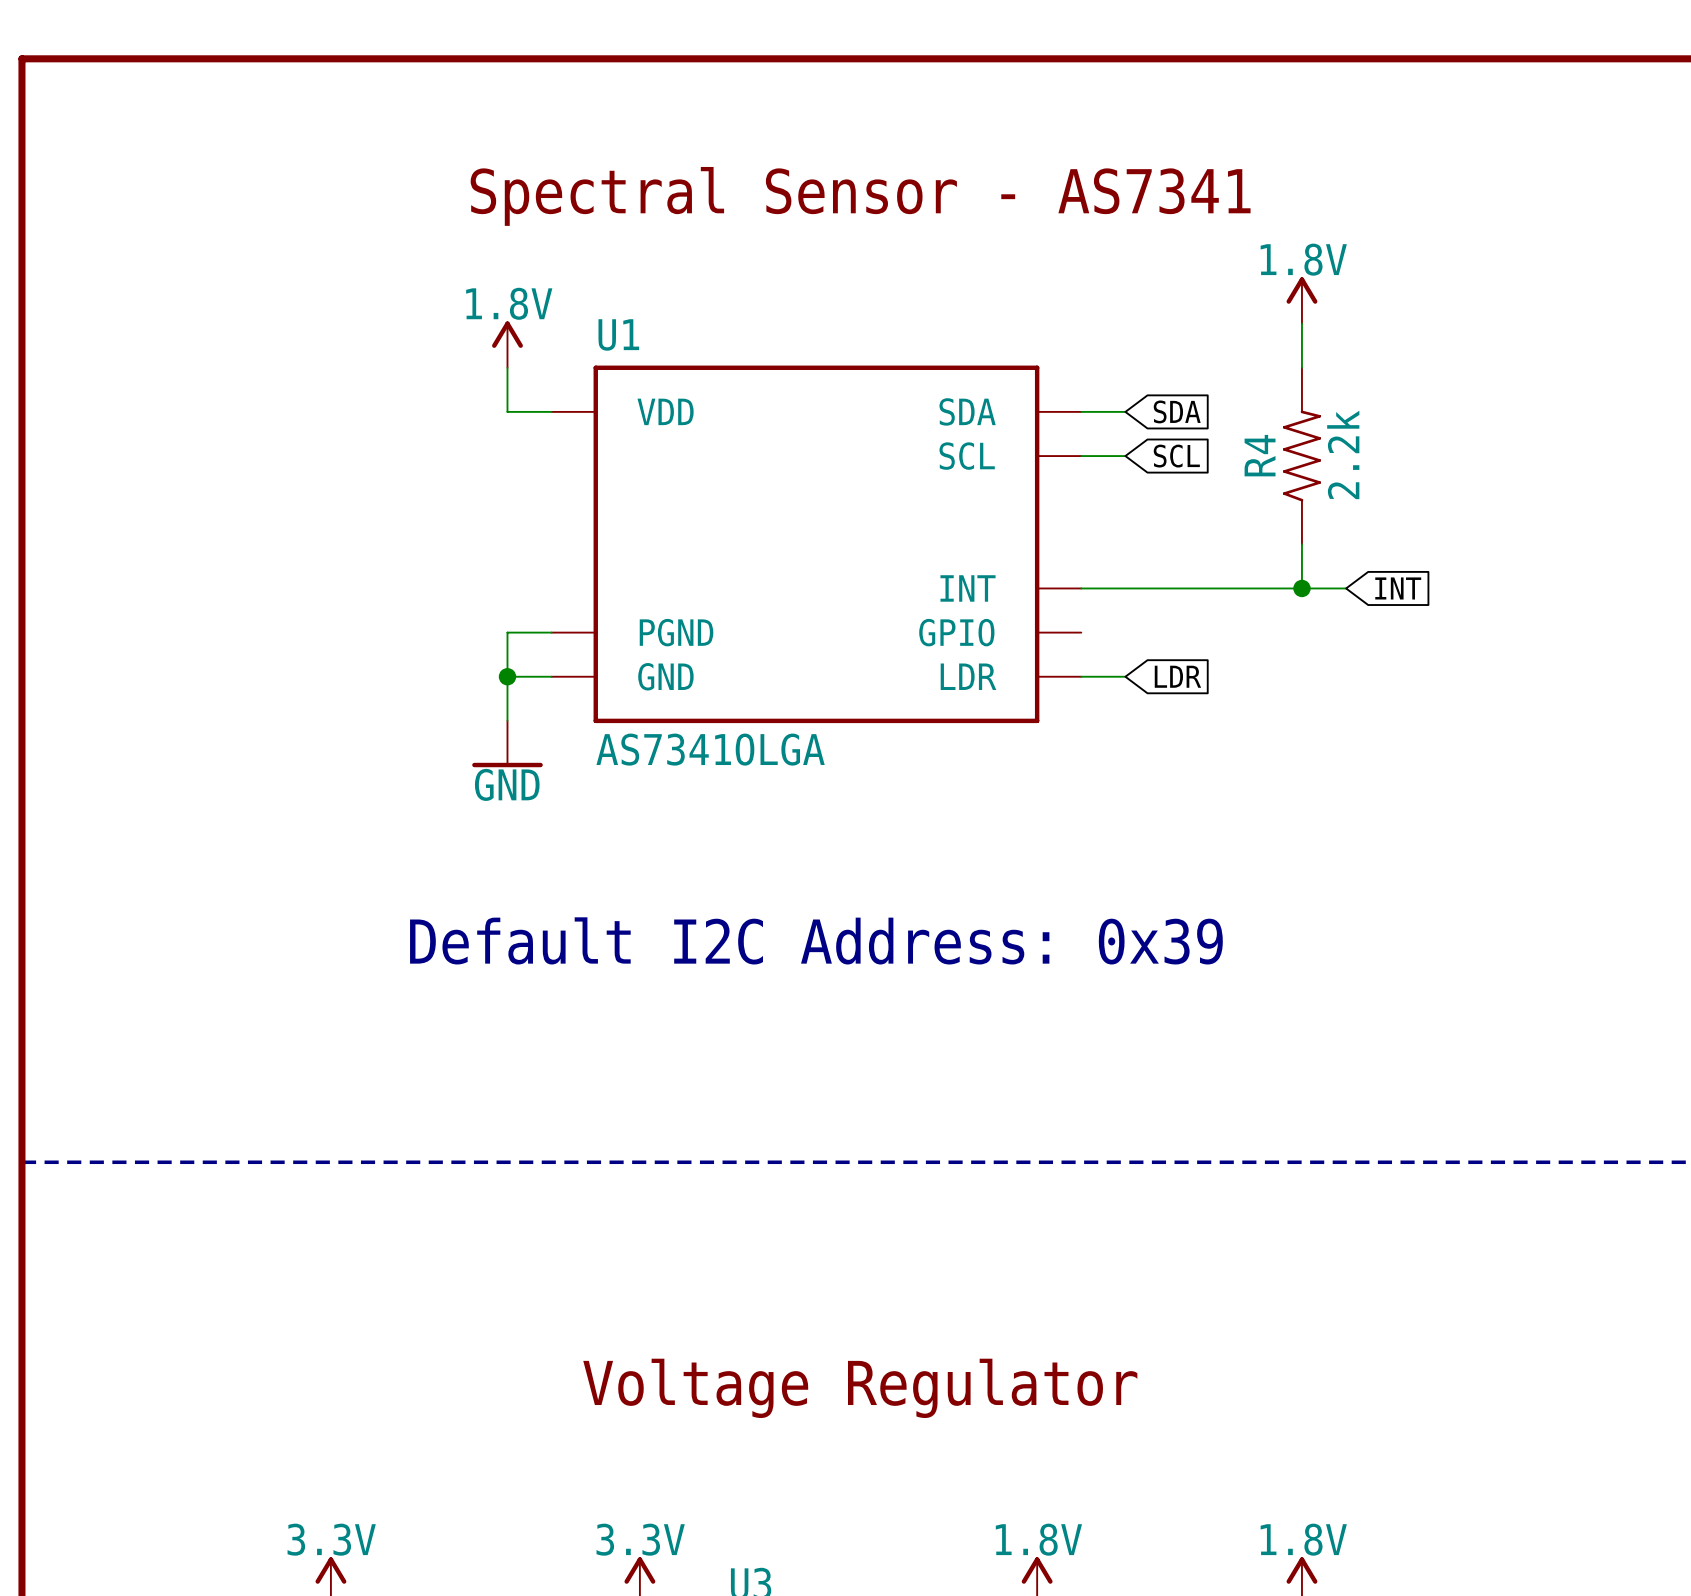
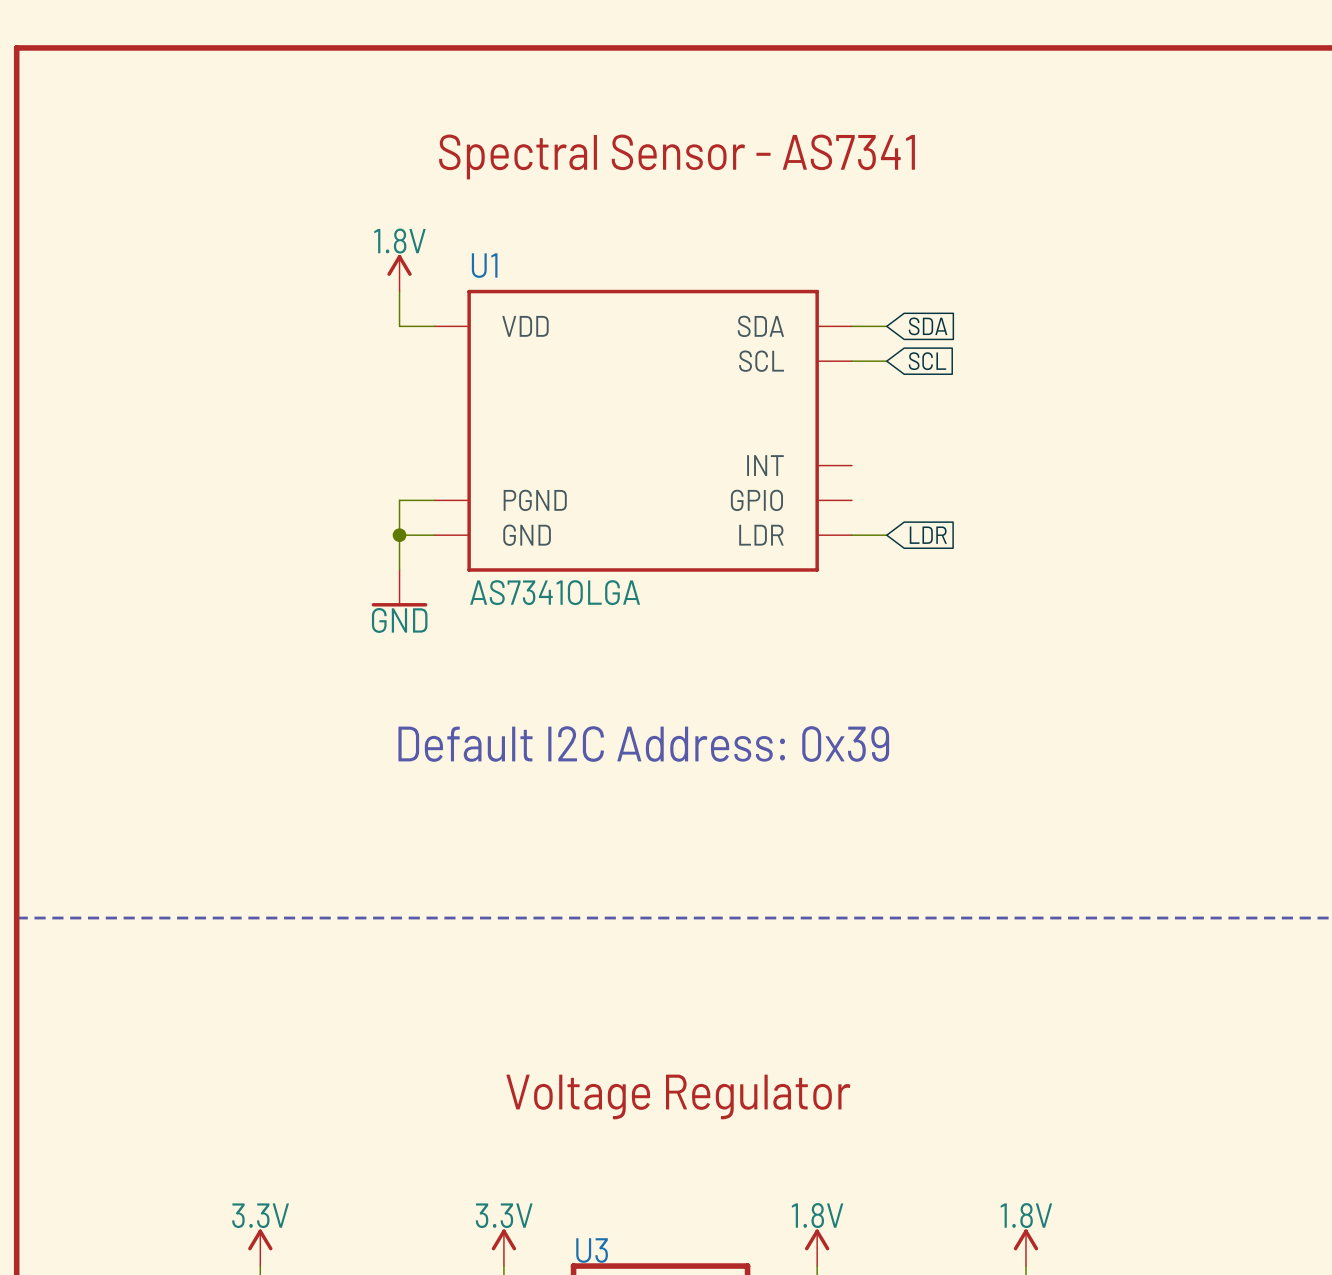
power symbol: 1.8V (1301, 300) -> none
wire: (1301, 323) (1301, 367) -> none
R4: 2.2k (1301, 456) -> none
wire: (1301, 544) (1301, 588) -> none
wire: (1081, 588) (1346, 588) -> none
junction: (1301, 588) -> none
global label: INT (1398, 588) -> none

